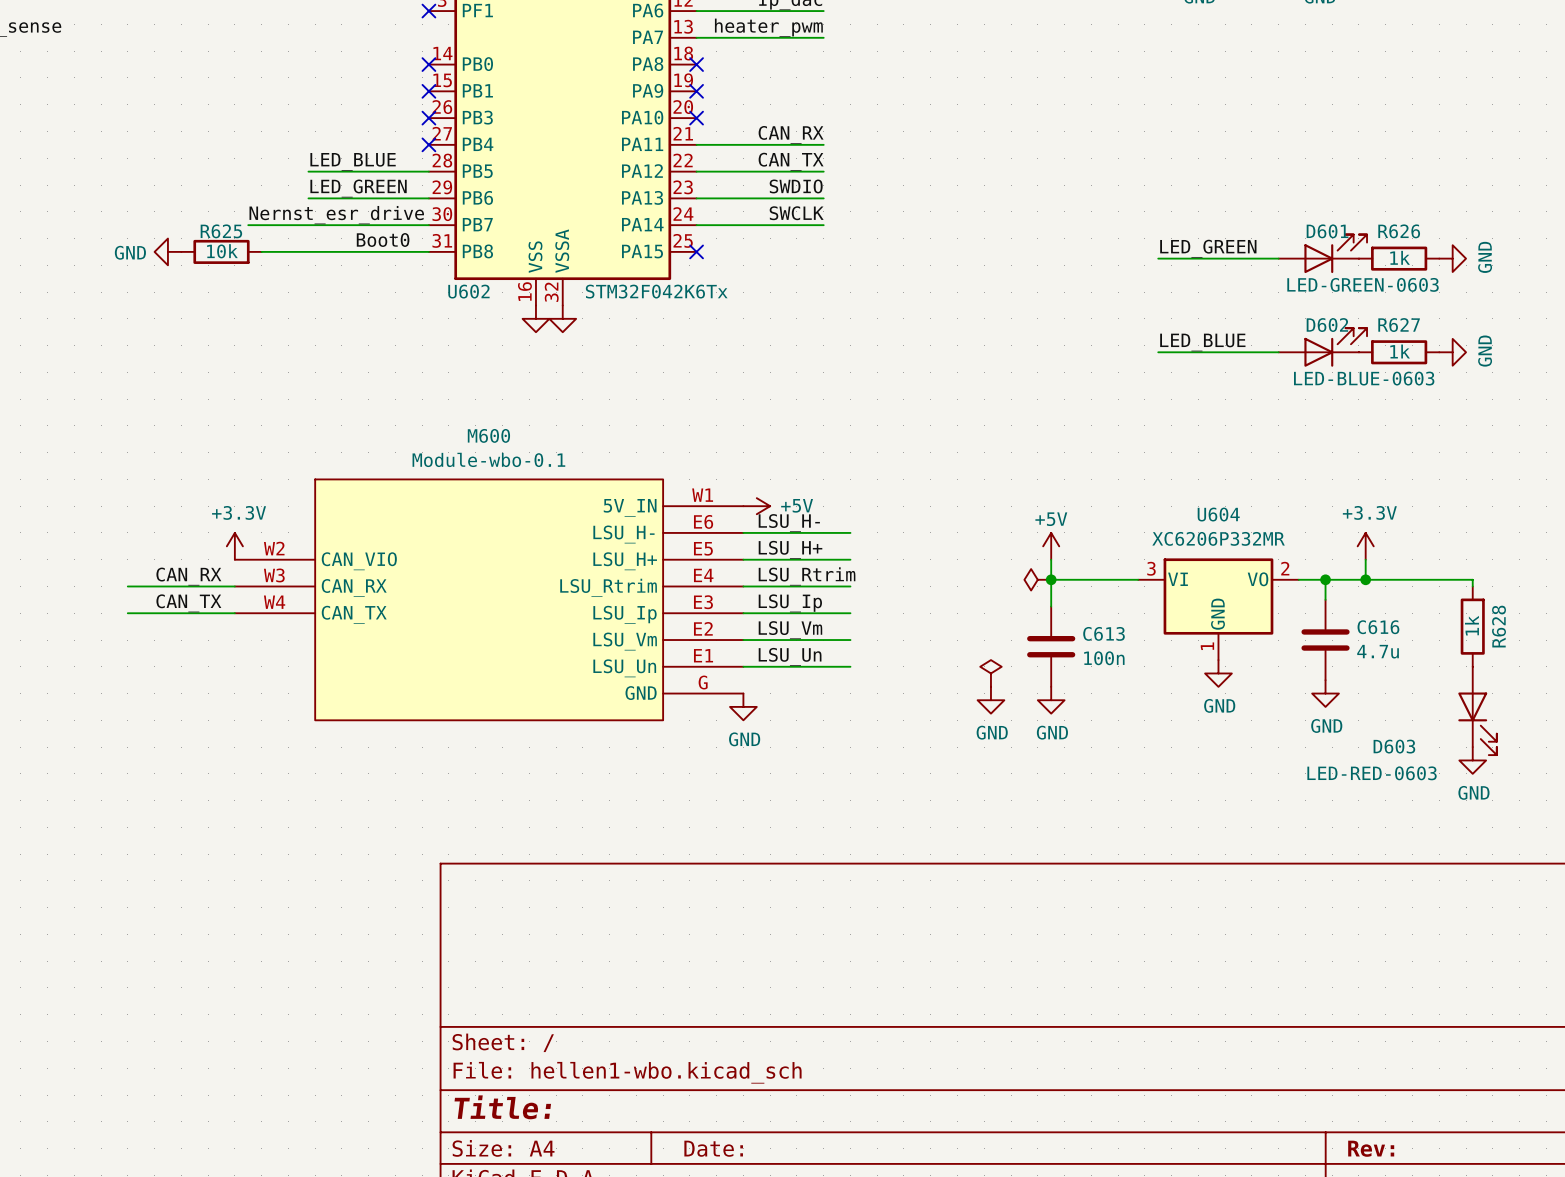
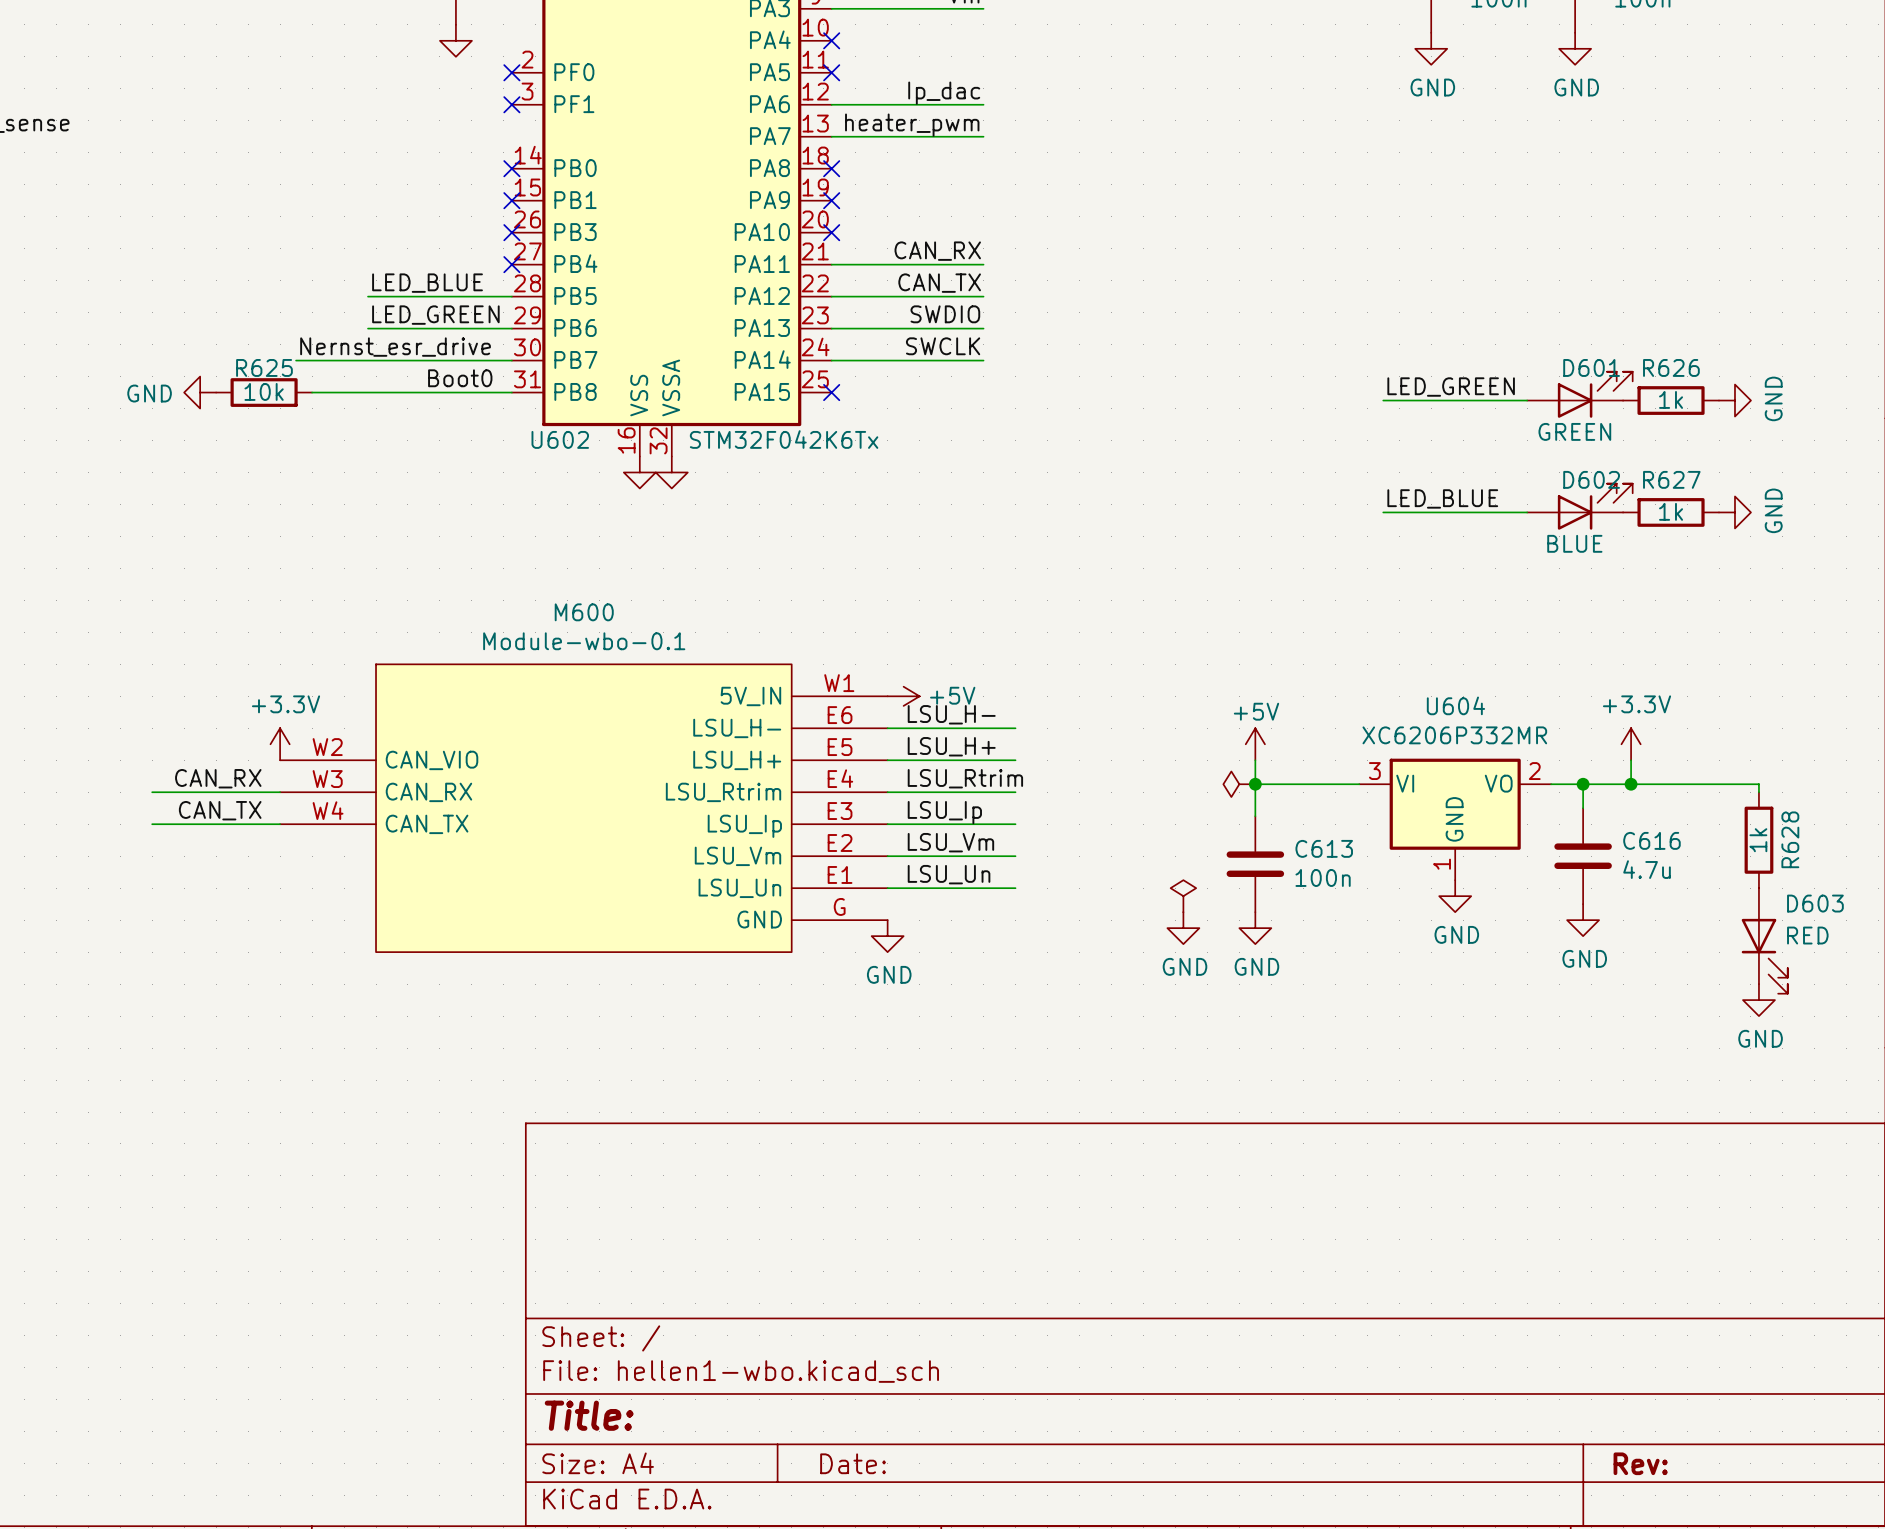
D601 value: LED-GREEN-0603 (1363, 284) -> GREEN (1574, 431)
D602 value: LED-BLUE-0603 (1364, 378) -> BLUE (1574, 543)
D603 name position: D603 (1394, 746) -> D603 (1815, 903)
D603 value: LED-RED-0603 (1372, 773) -> RED (1807, 935)

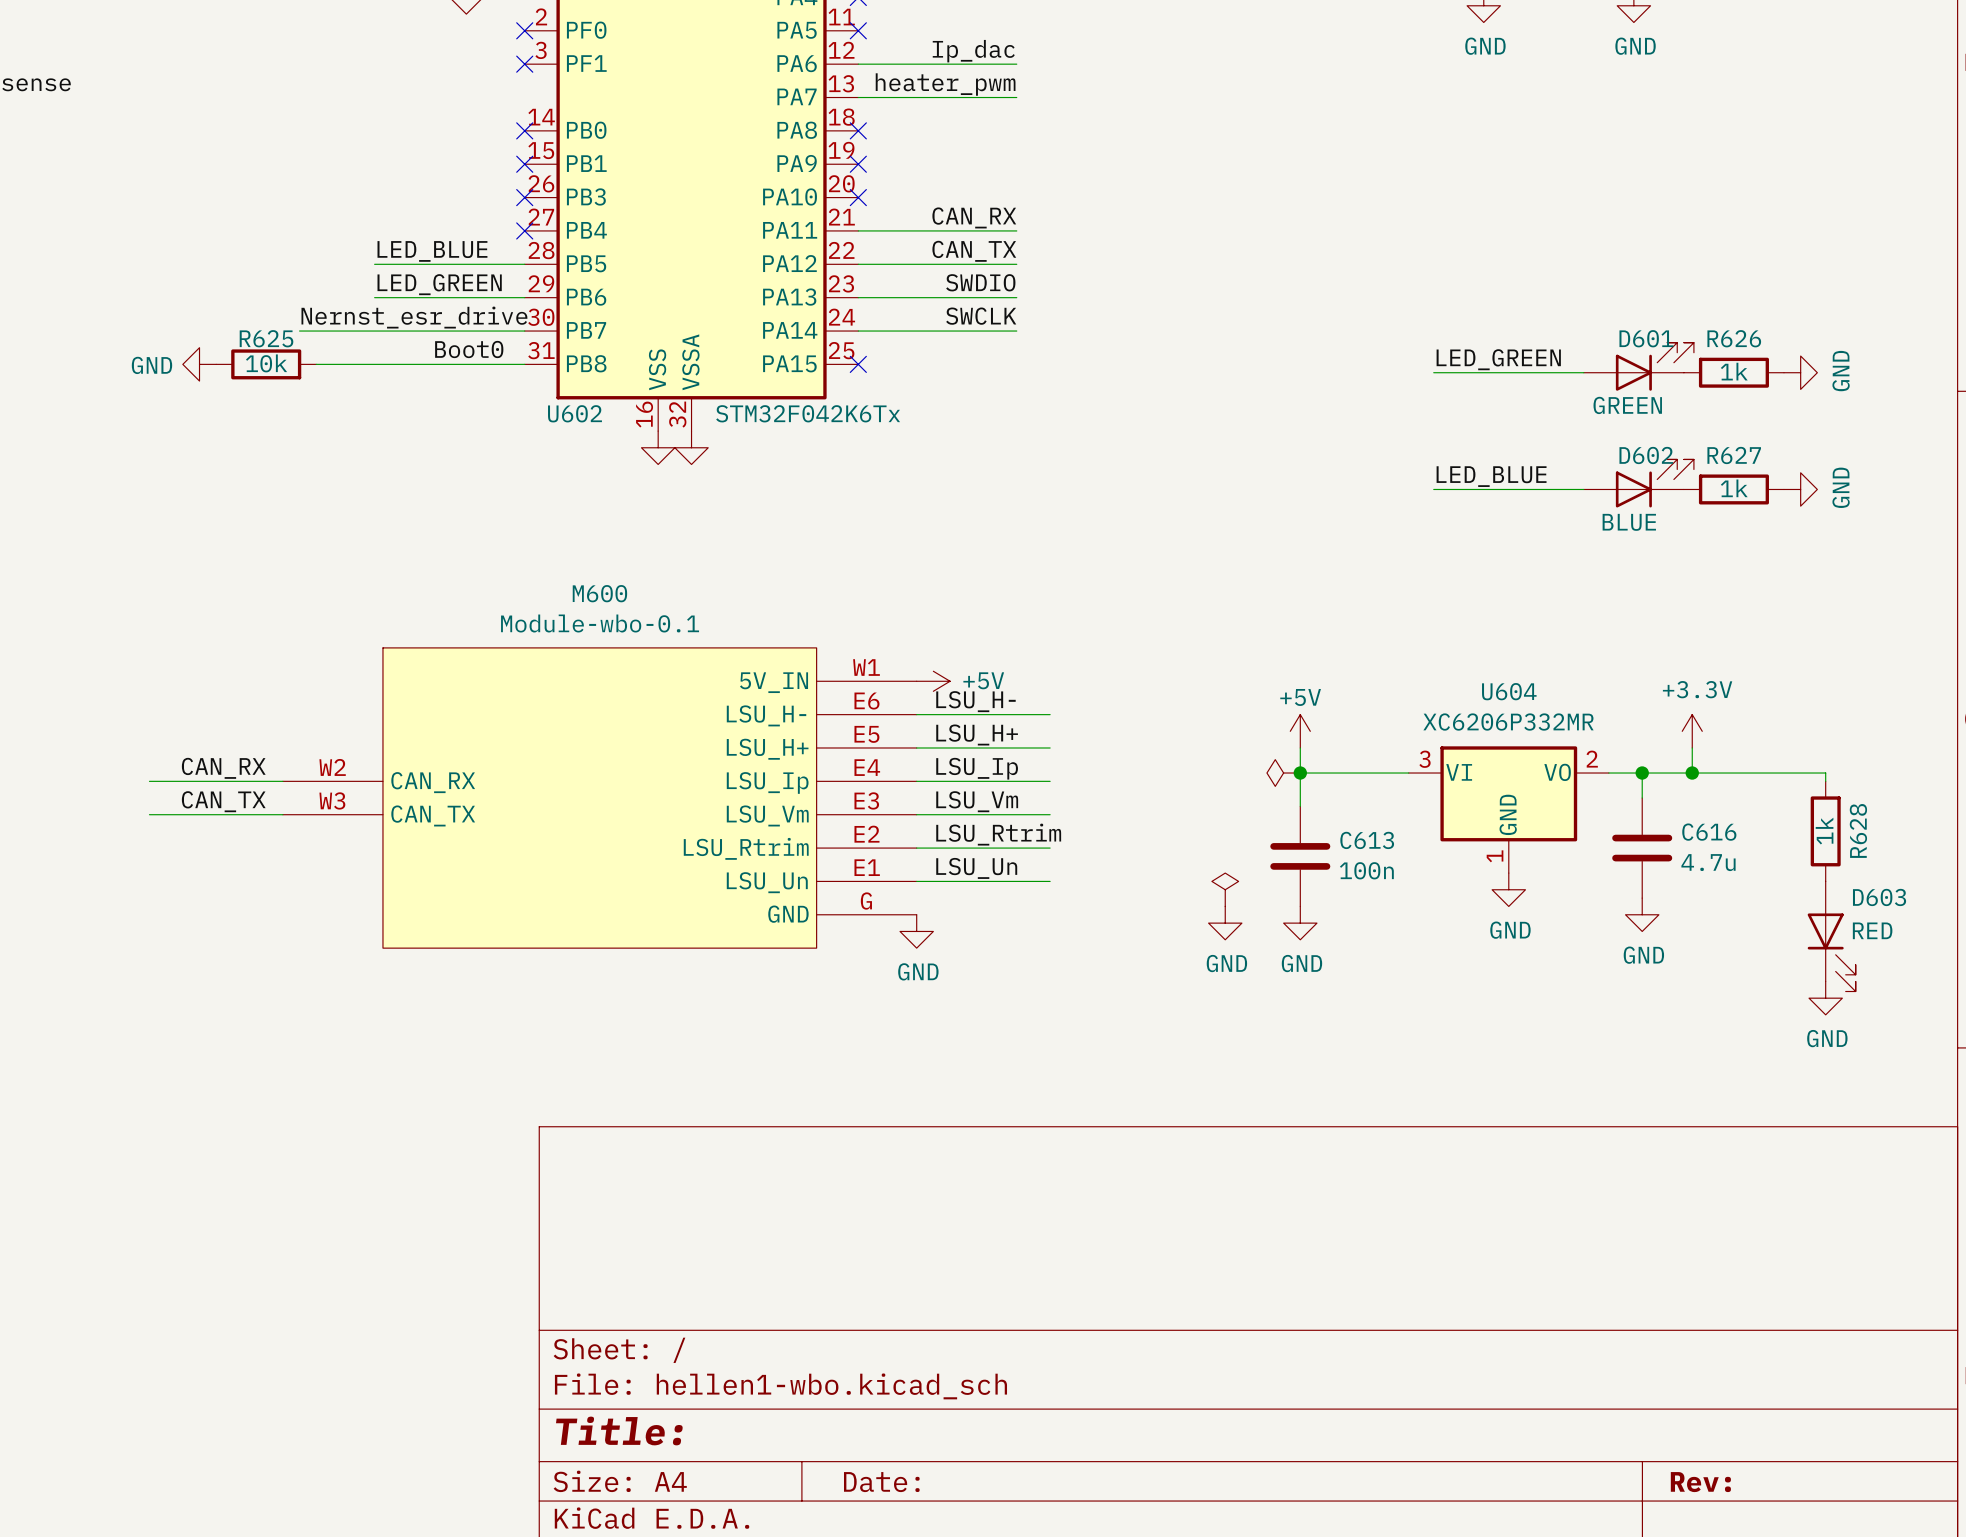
M600 symbol: [280, 664, 888, 953] -> [282, 647, 917, 949]
power symbol: +3.3V (280, 744) -> none
label: LSU_Rtrim (965, 778) -> LSU_Ip (977, 768)
label: LSU_Ip (944, 812) -> LSU_Vm (977, 801)
label: LSU_Vm (950, 842) -> LSU_Rtrim (998, 834)

